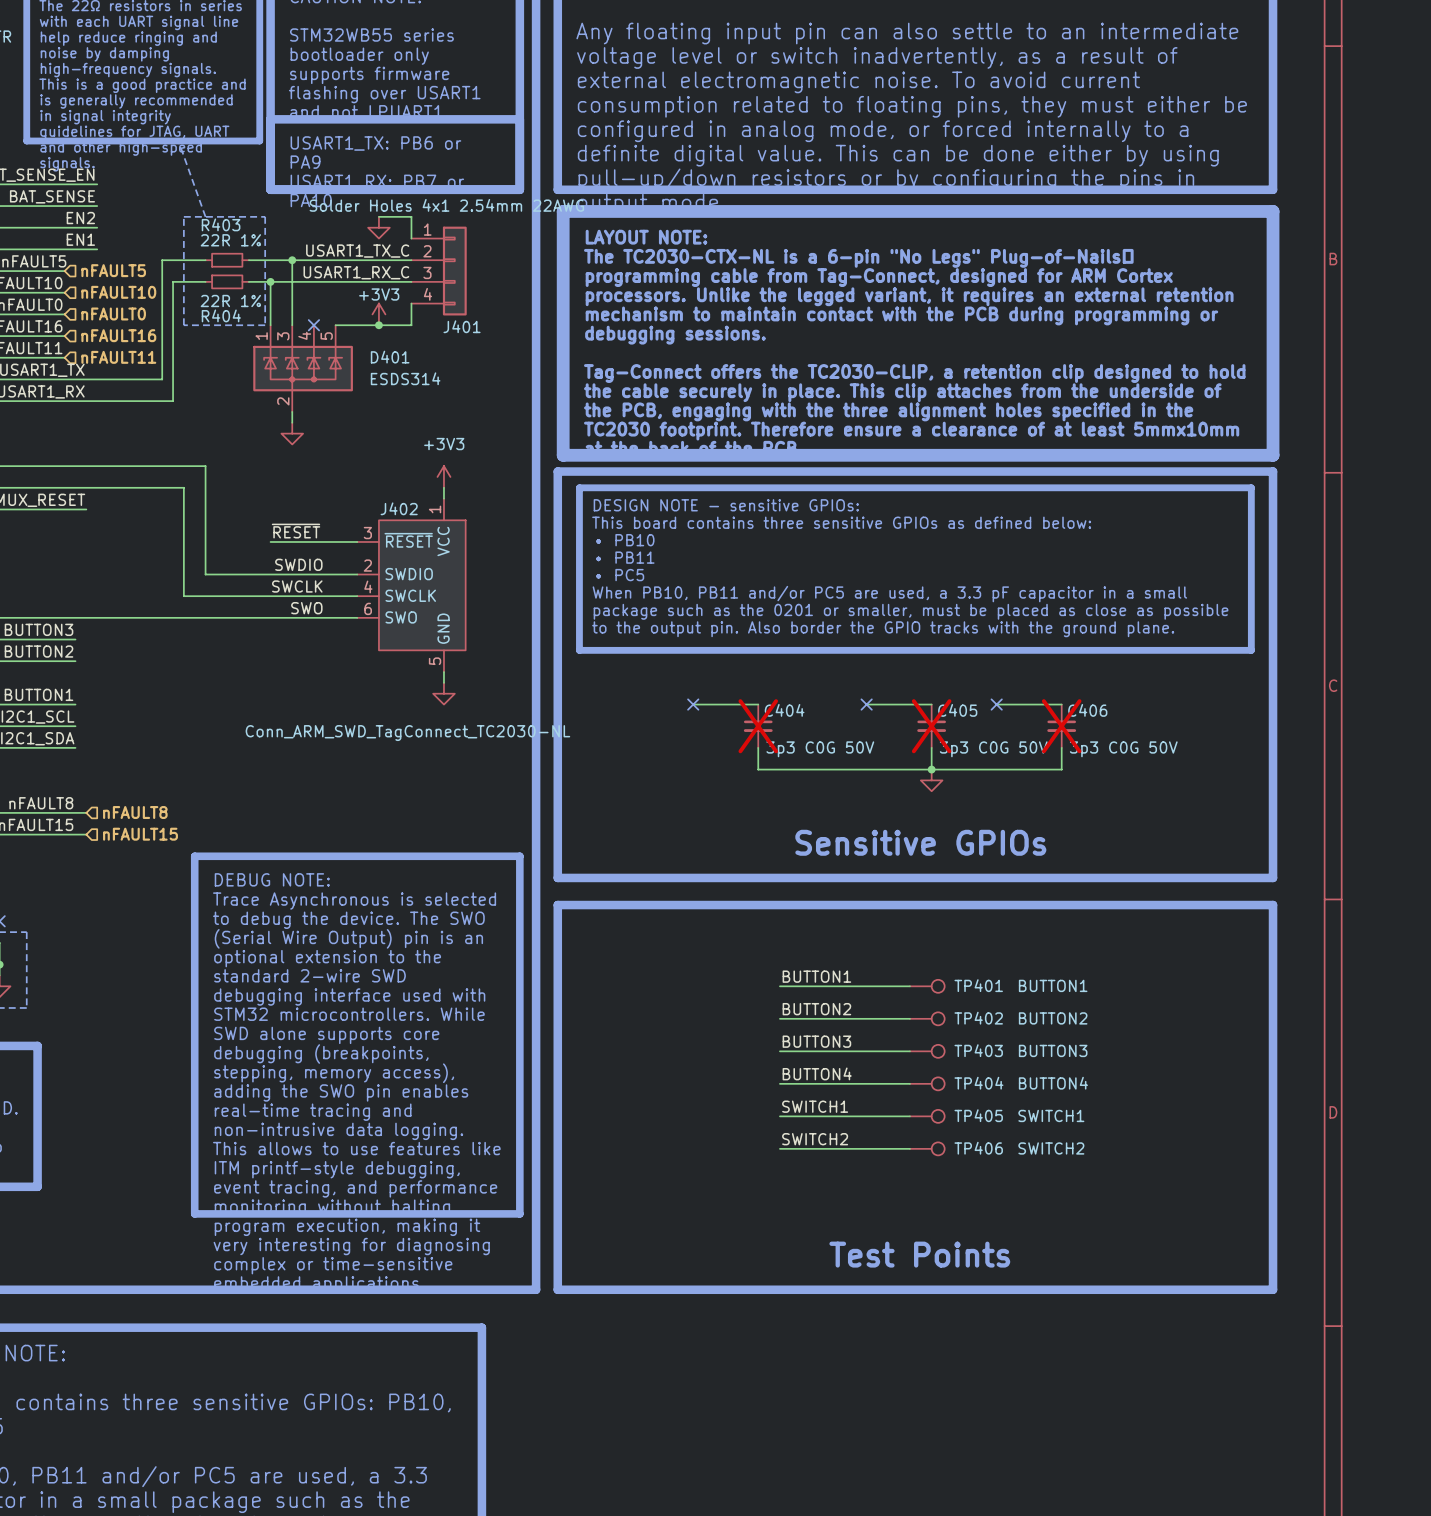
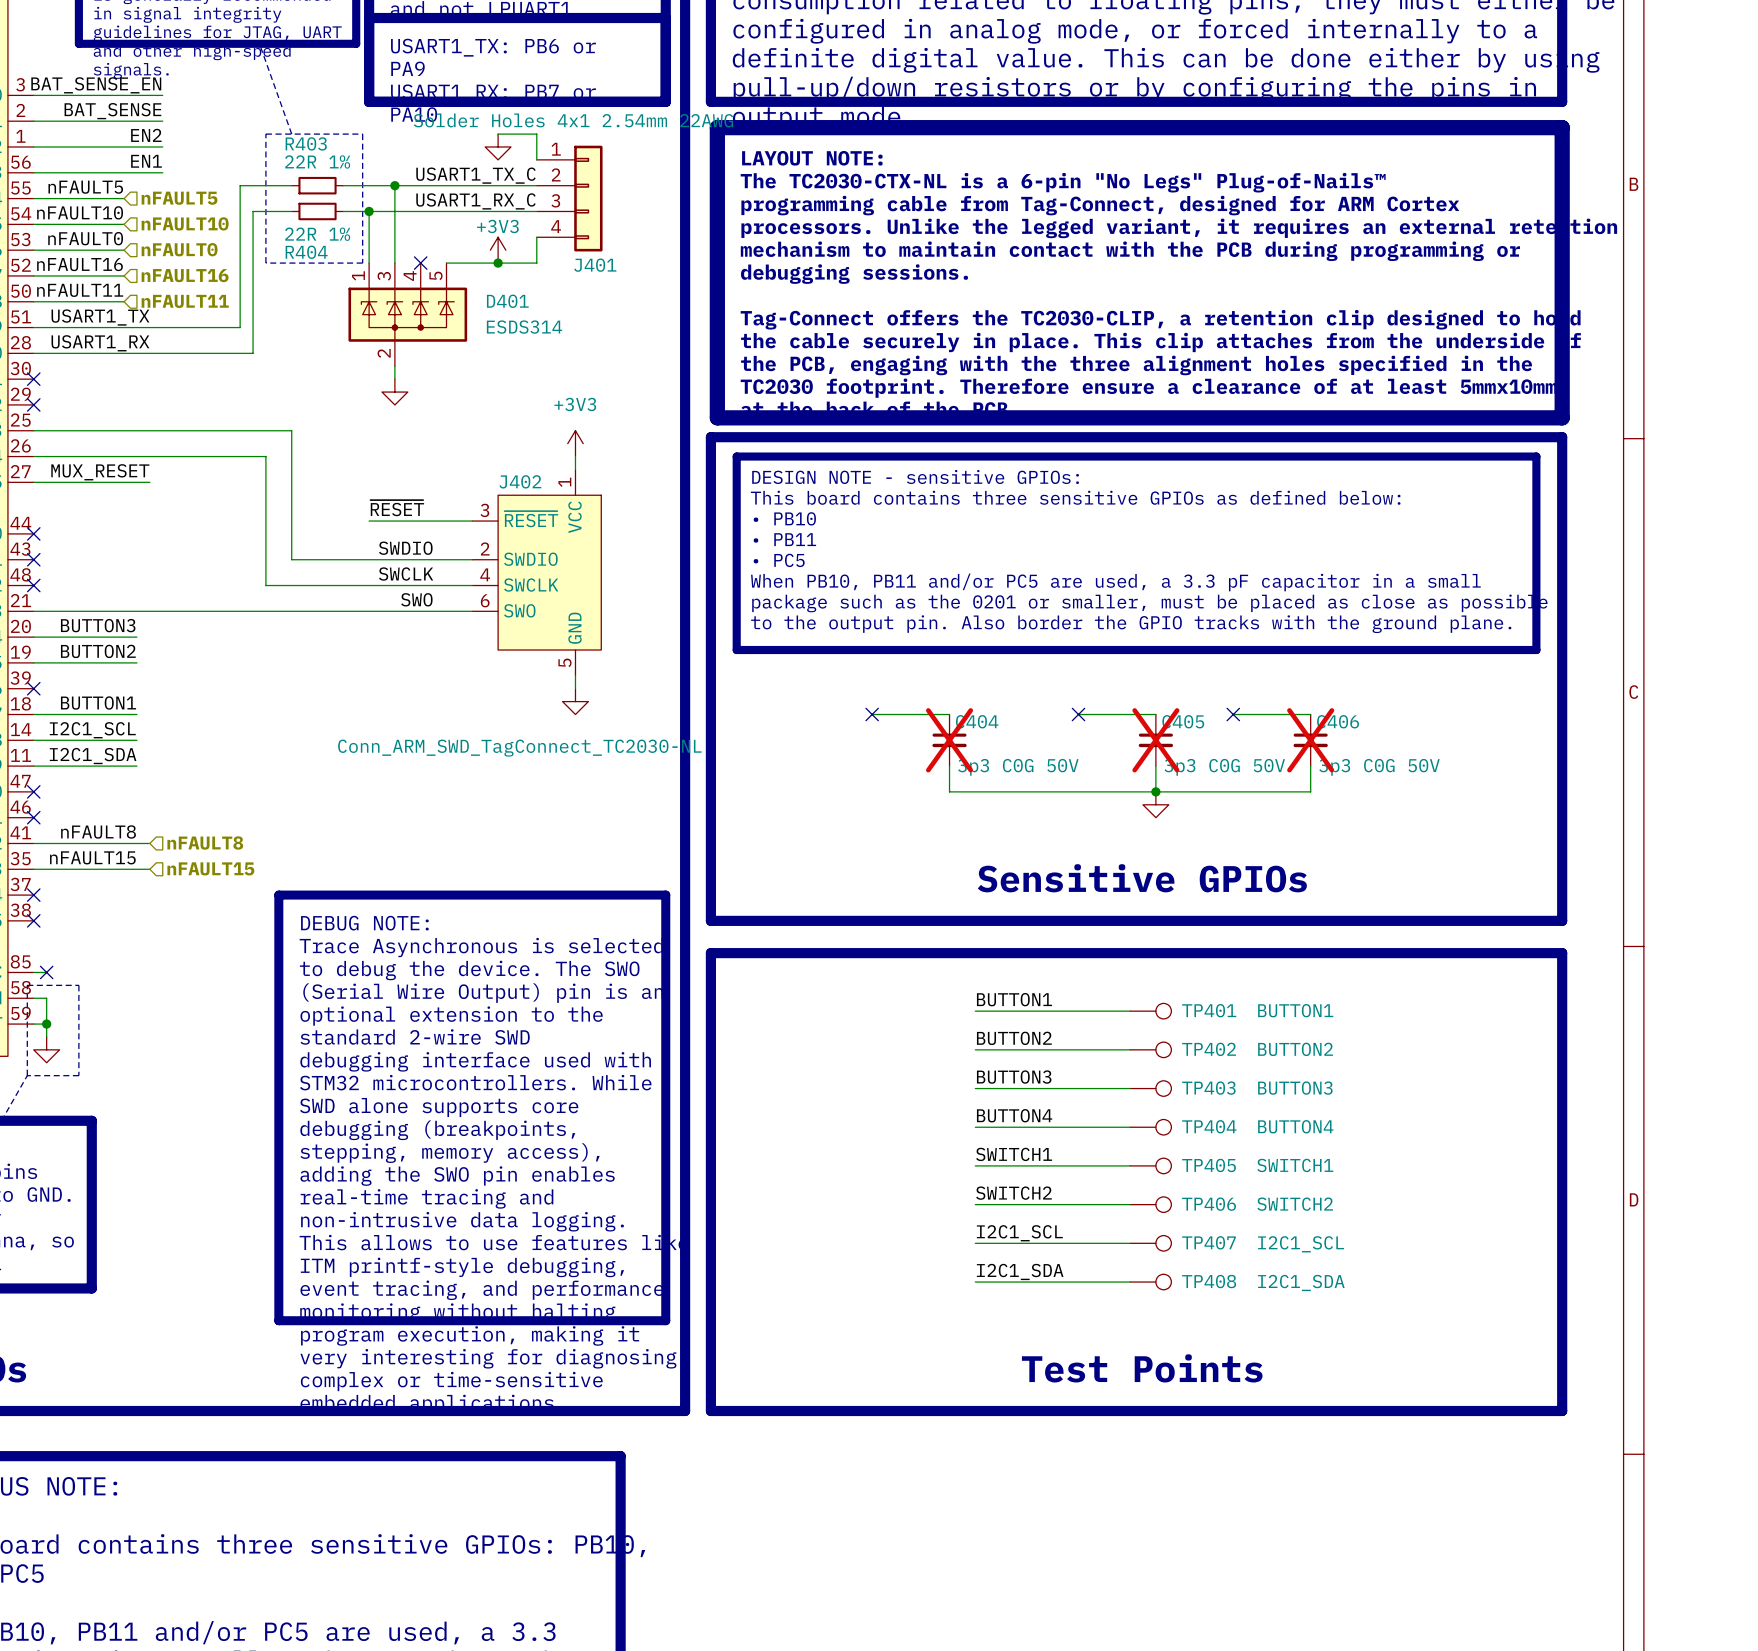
label: none -> BUTTON1 (1014, 999)
wire: none -> (975, 1011) (1130, 1011)
TP401: none -> BUTTON1 (1150, 1011)
label: BUTTON1 (816, 976) -> BUTTON2 (1014, 1038)
TP401 name: TP401 (978, 985) -> TP402 (1209, 1049)
TP401 value: BUTTON1 (1053, 985) -> BUTTON2 (1295, 1049)
label: BUTTON2 (816, 1009) -> BUTTON3 (1014, 1077)
TP402 name: TP402 (978, 1018) -> TP403 (1208, 1088)
TP402 value: BUTTON2 (1053, 1018) -> BUTTON3 (1295, 1088)
label: BUTTON3 (816, 1041) -> BUTTON4 (1014, 1115)
TP403 name: TP403 (978, 1050) -> TP404 (1209, 1126)
TP403 value: BUTTON3 (1053, 1050) -> BUTTON4 (1295, 1126)
label: BUTTON4 (817, 1073) -> SWITCH1 (1014, 1154)
TP404 name: TP404 (978, 1083) -> TP405 (1209, 1165)
TP404 value: BUTTON4 (1053, 1083) -> SWITCH1 (1295, 1165)
label: SWITCH1 (815, 1106) -> SWITCH2 (1013, 1193)
TP405 name: TP405 (978, 1115) -> TP406 (1209, 1204)
TP405 value: SWITCH1 (1051, 1115) -> SWITCH2 (1295, 1204)
label: SWITCH2 (815, 1139) -> I2C1_SCL (1019, 1233)
TP406 name: TP406 (978, 1148) -> TP407 (1209, 1242)
TP406 value: SWITCH2 (1051, 1148) -> I2C1_SCL (1301, 1244)
label: none -> I2C1_SDA (1020, 1271)
wire: none -> (975, 1282) (1130, 1282)
TP408: none -> I2C1_SDA (1150, 1282)

